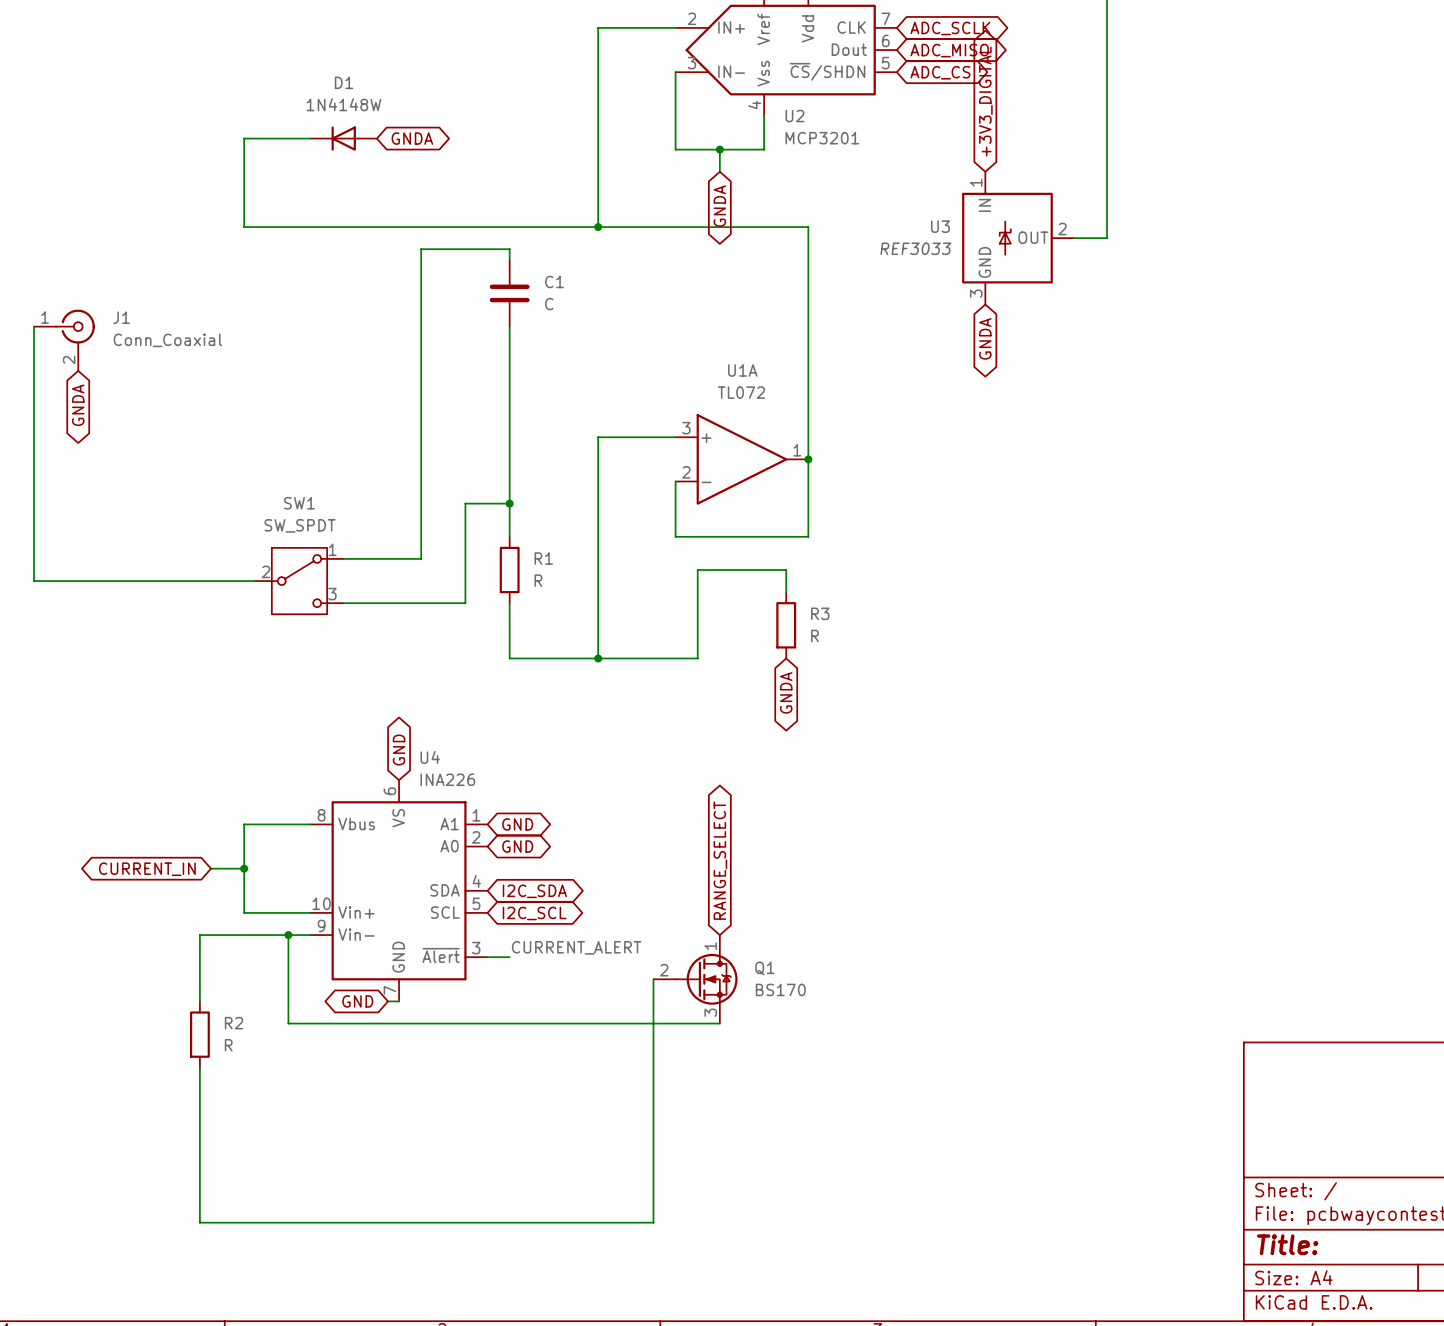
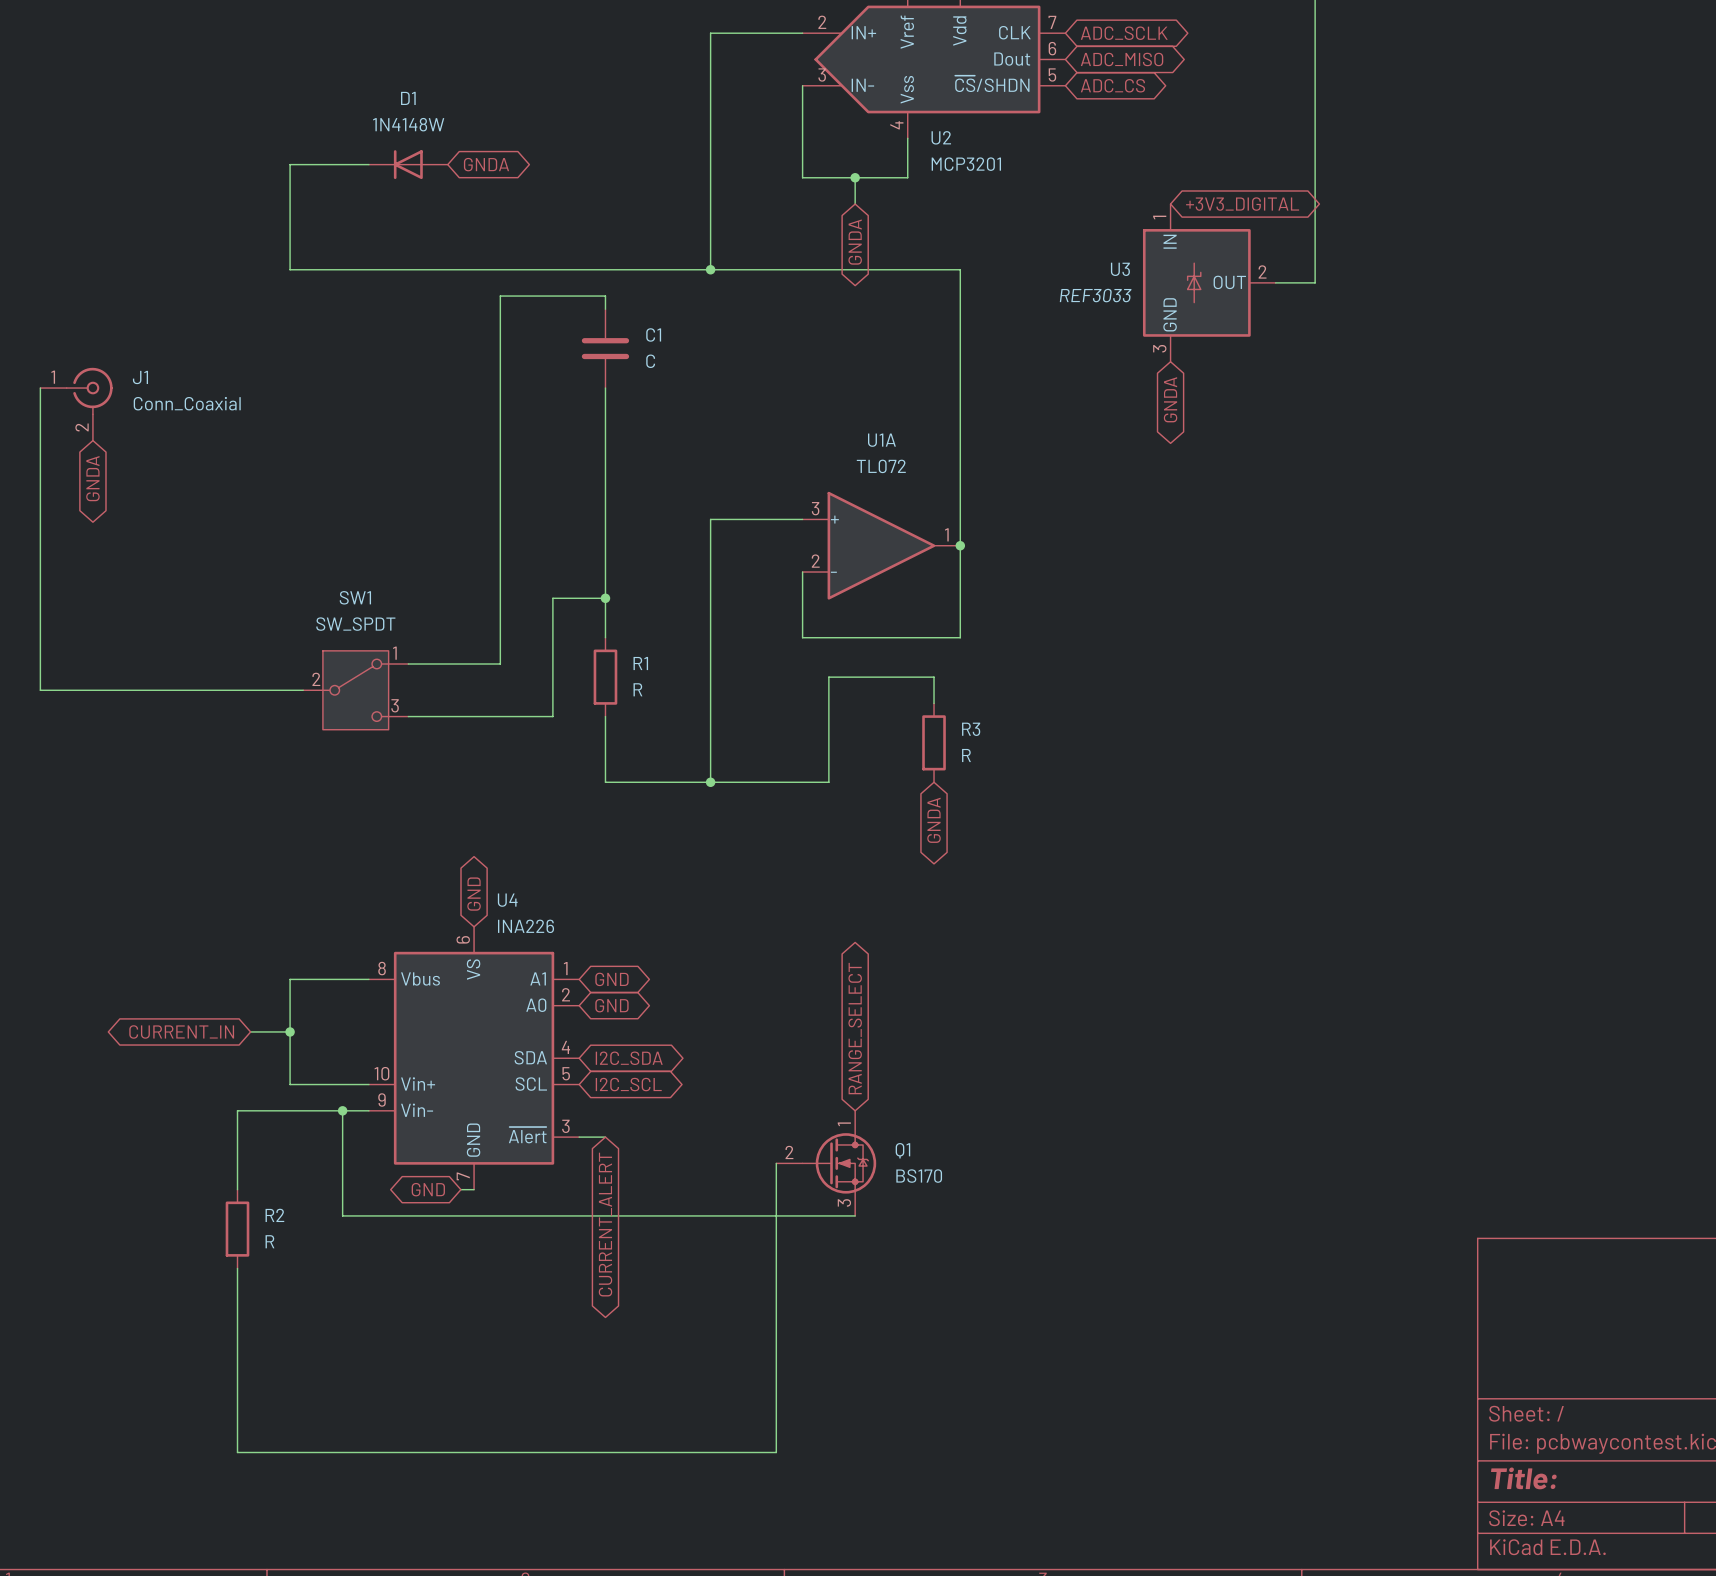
global label rotation: 0° (985, 101) -> 90° clockwise (1242, 204)
label: CURRENT_ALERT (576, 947) -> none
global label: none -> CURRENT_ALERT (605, 1224)

